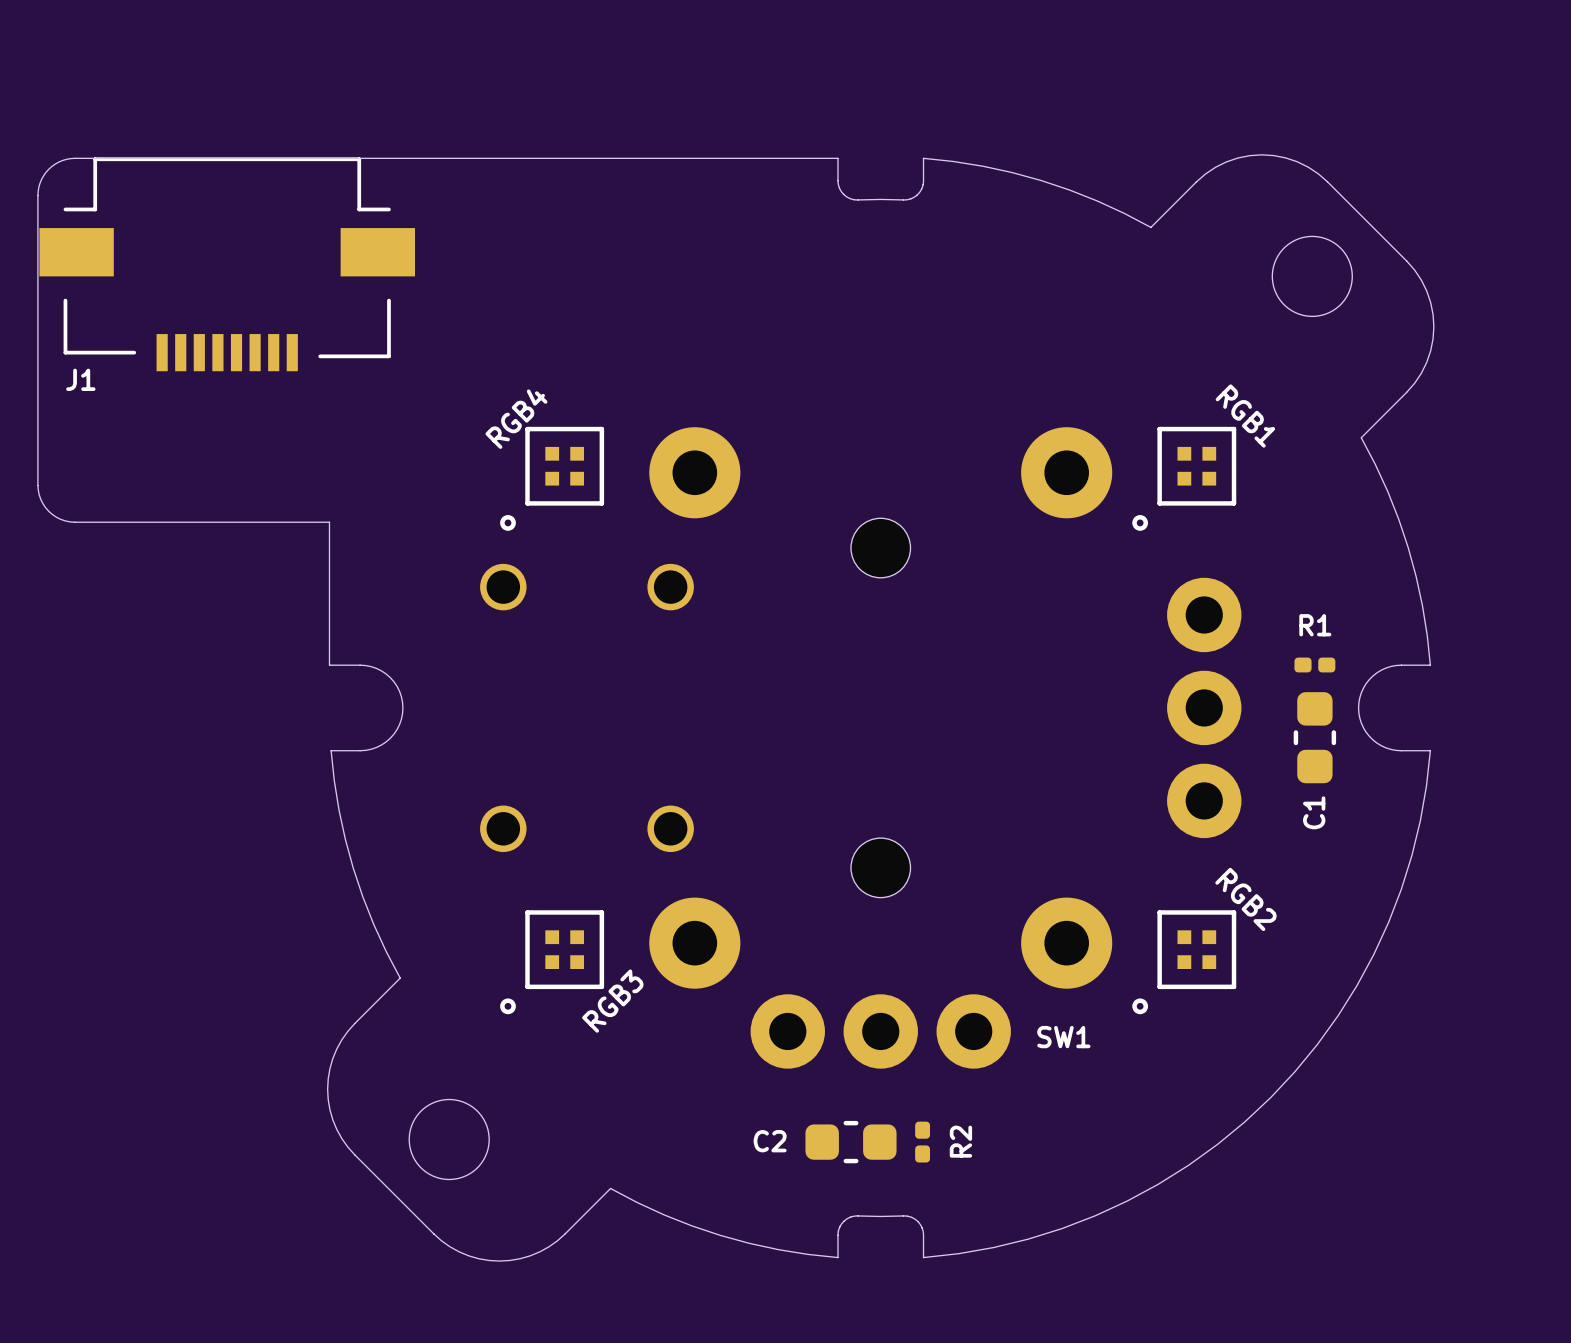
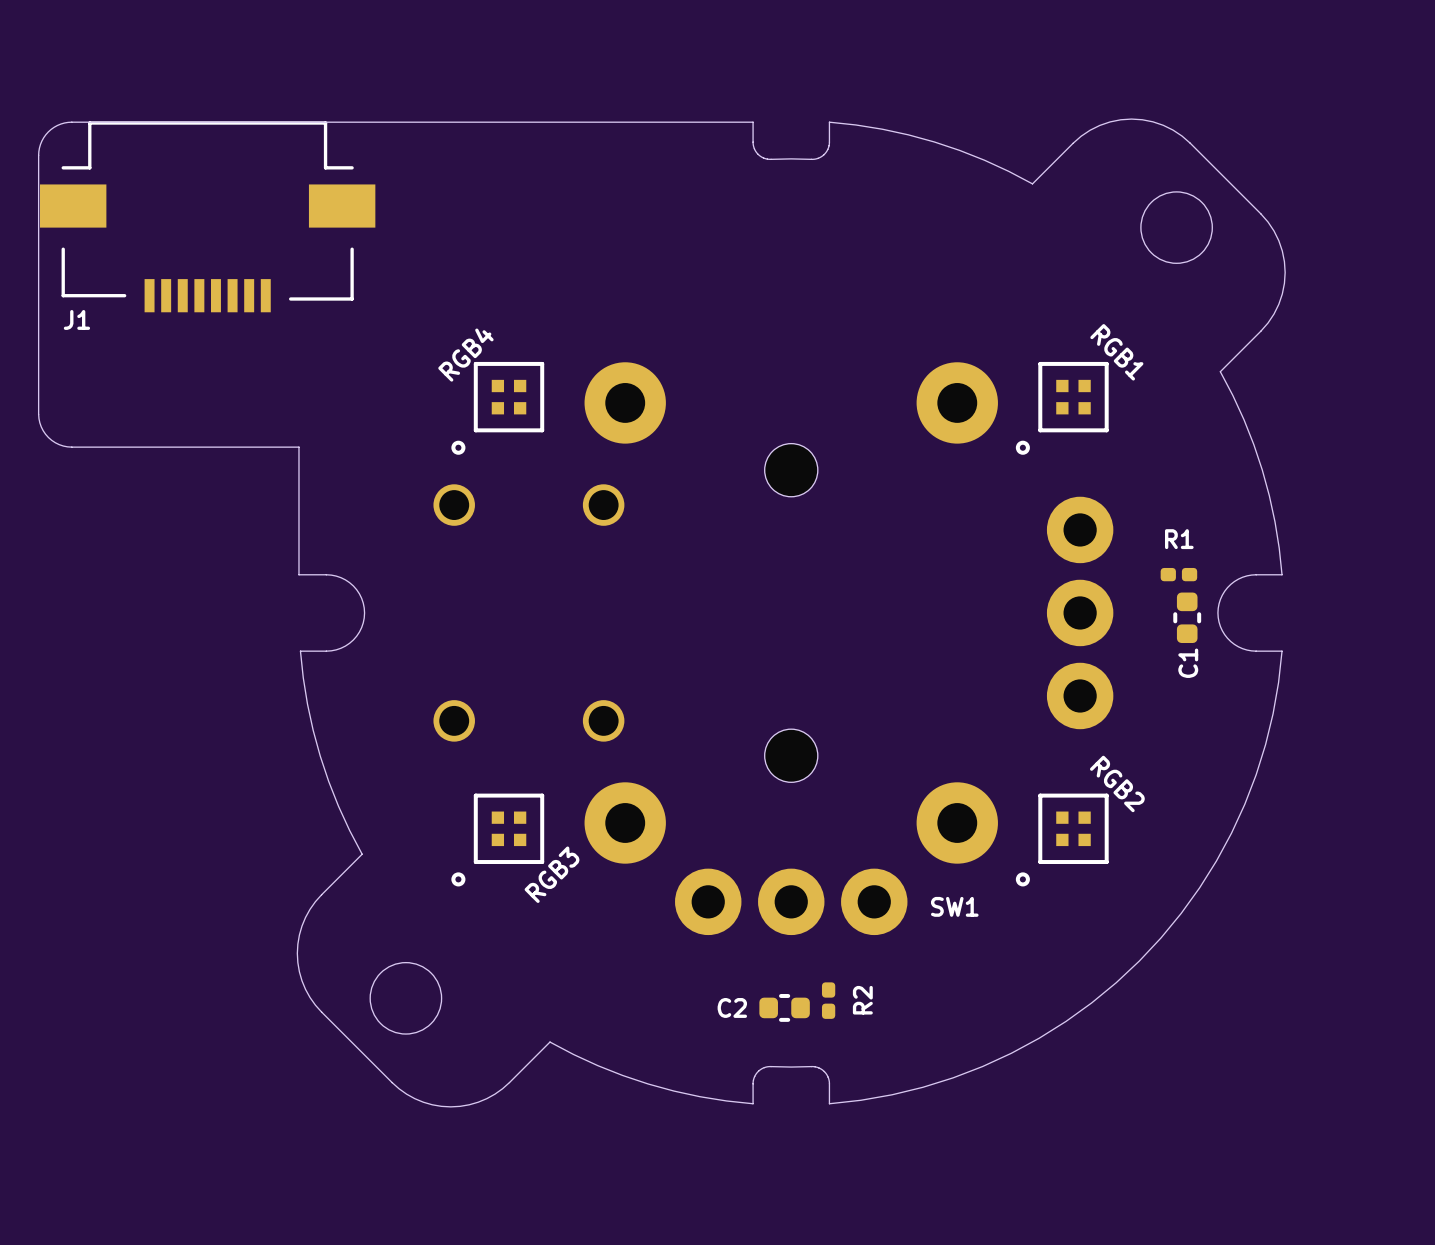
C1 footprint: [1293, 692, 1337, 784] -> [1173, 592, 1202, 644]
C2 footprint: [805, 1120, 897, 1164] -> [759, 993, 810, 1022]

